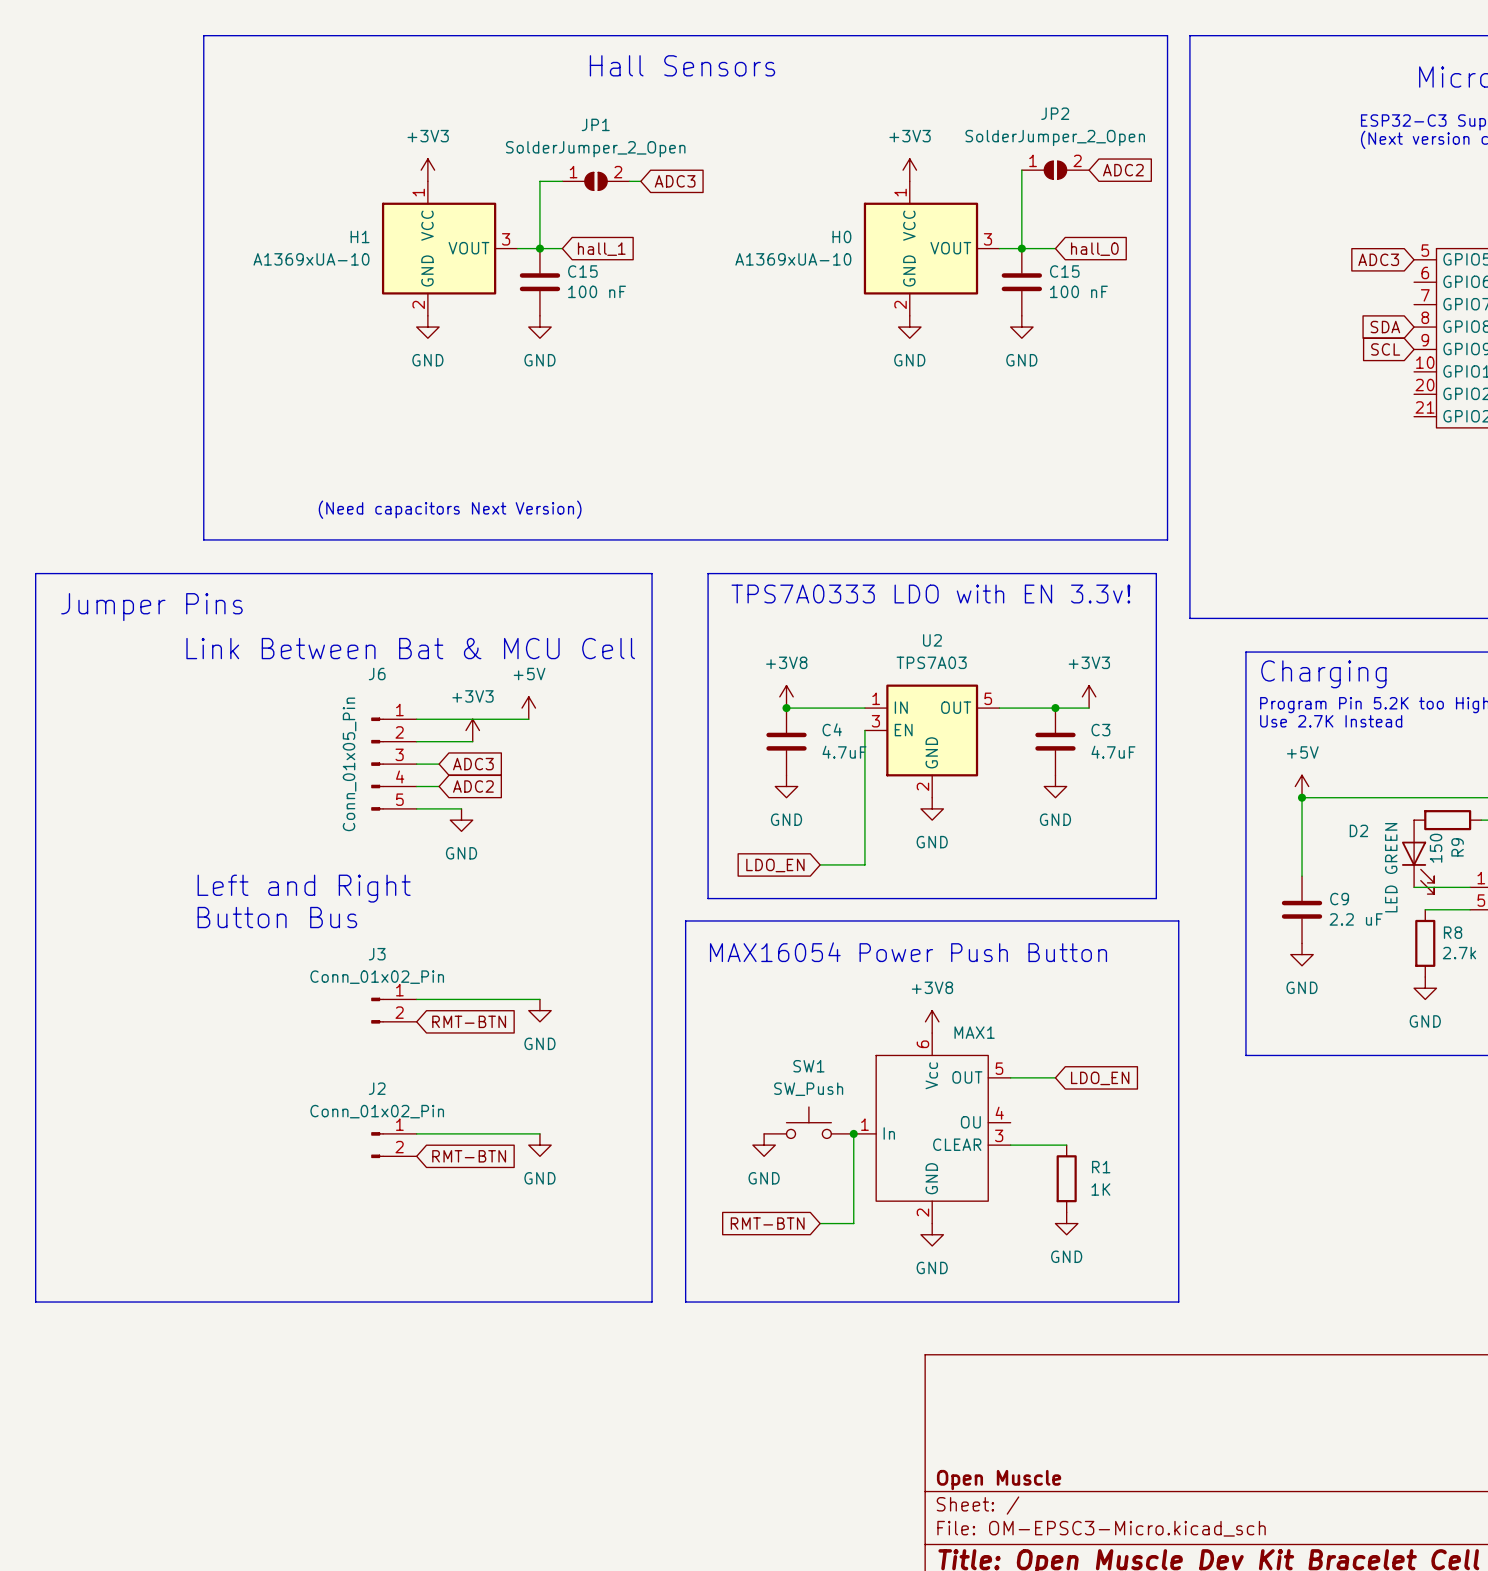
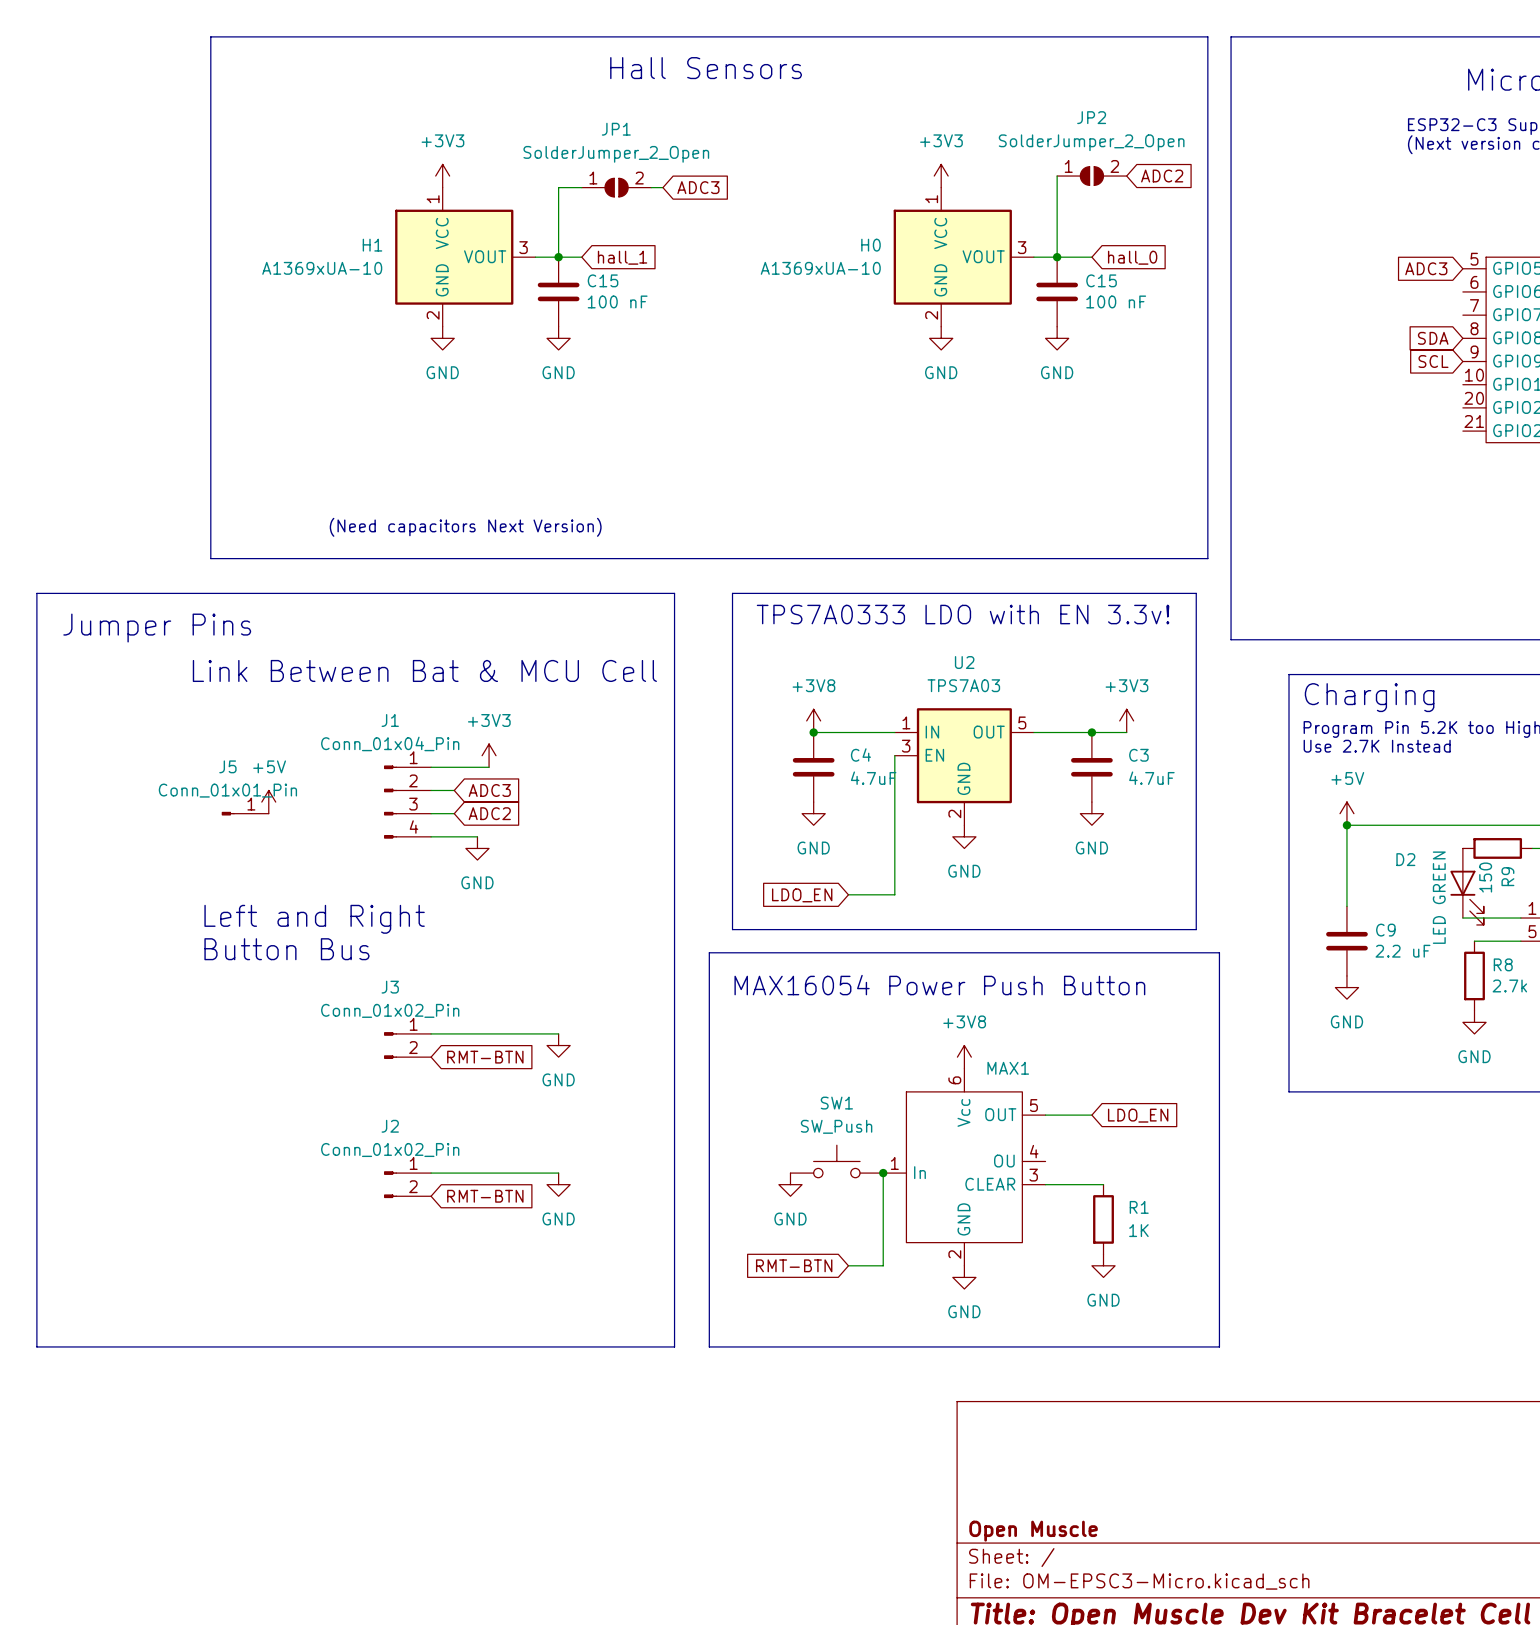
power symbol: +5V (528, 708) -> none
wire: (416, 719) (528, 719) -> none
J6: Conn_01x05_Pin (393, 764) -> none
power symbol: none -> +5V (268, 802)
J1: none -> Conn_01x04_Pin (407, 802)
J5: none -> Conn_01x01_Pin (245, 813)

